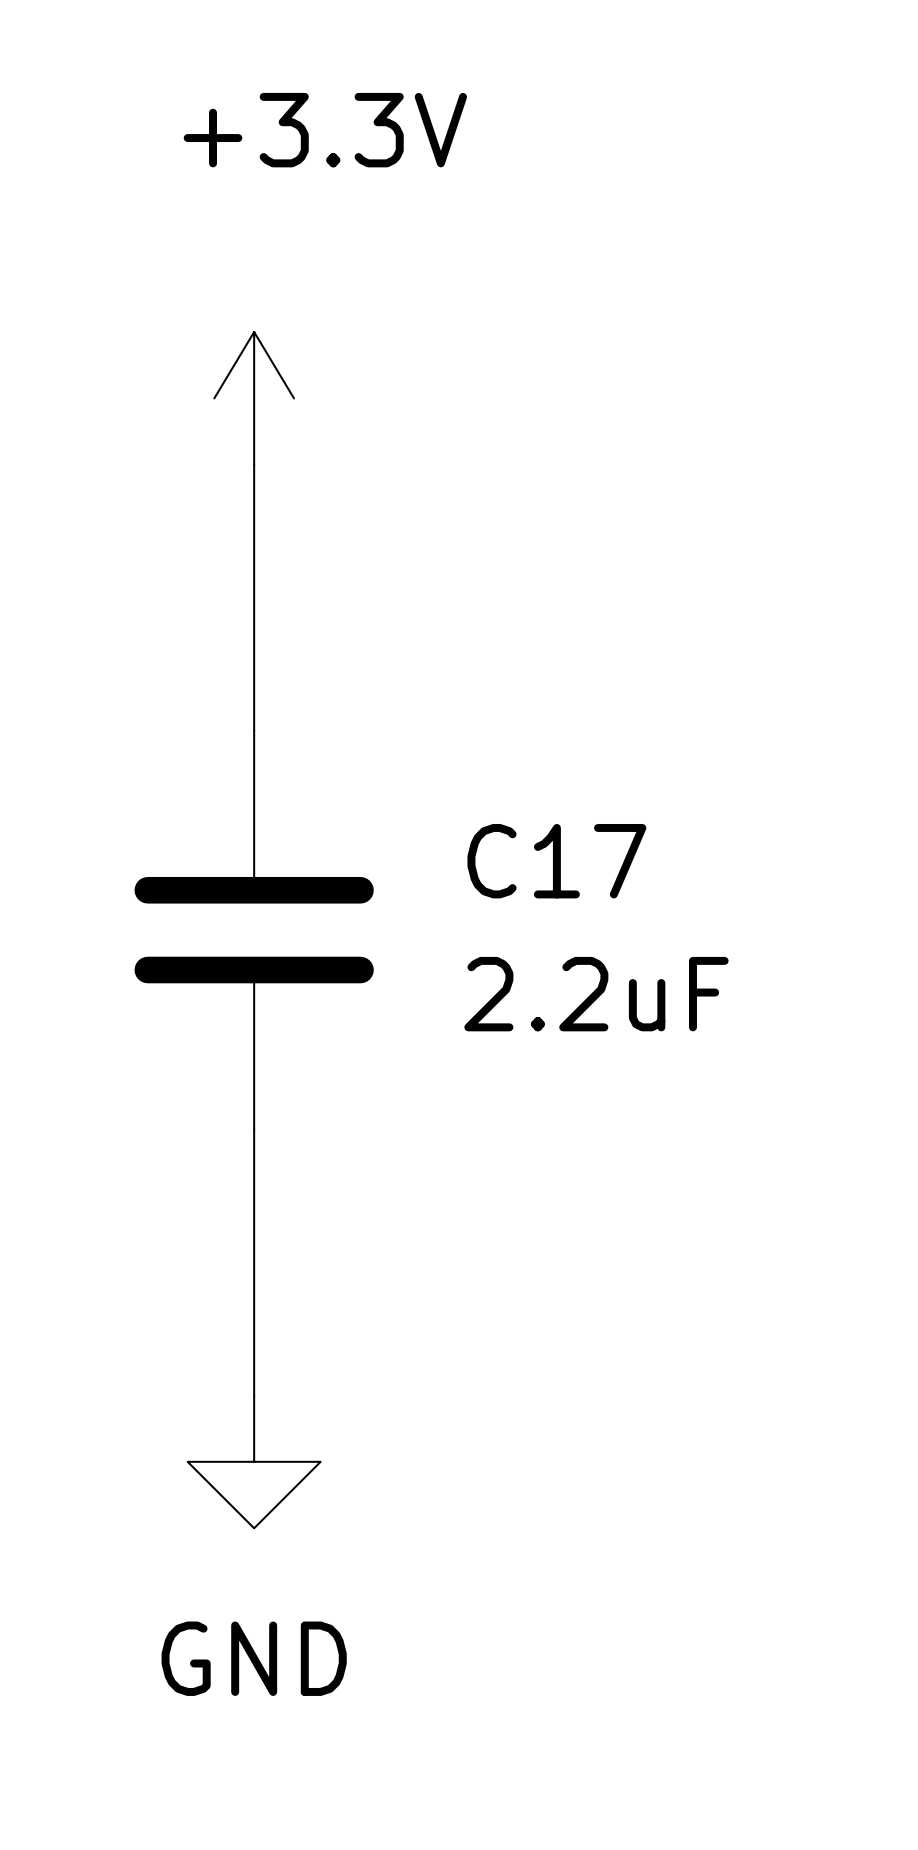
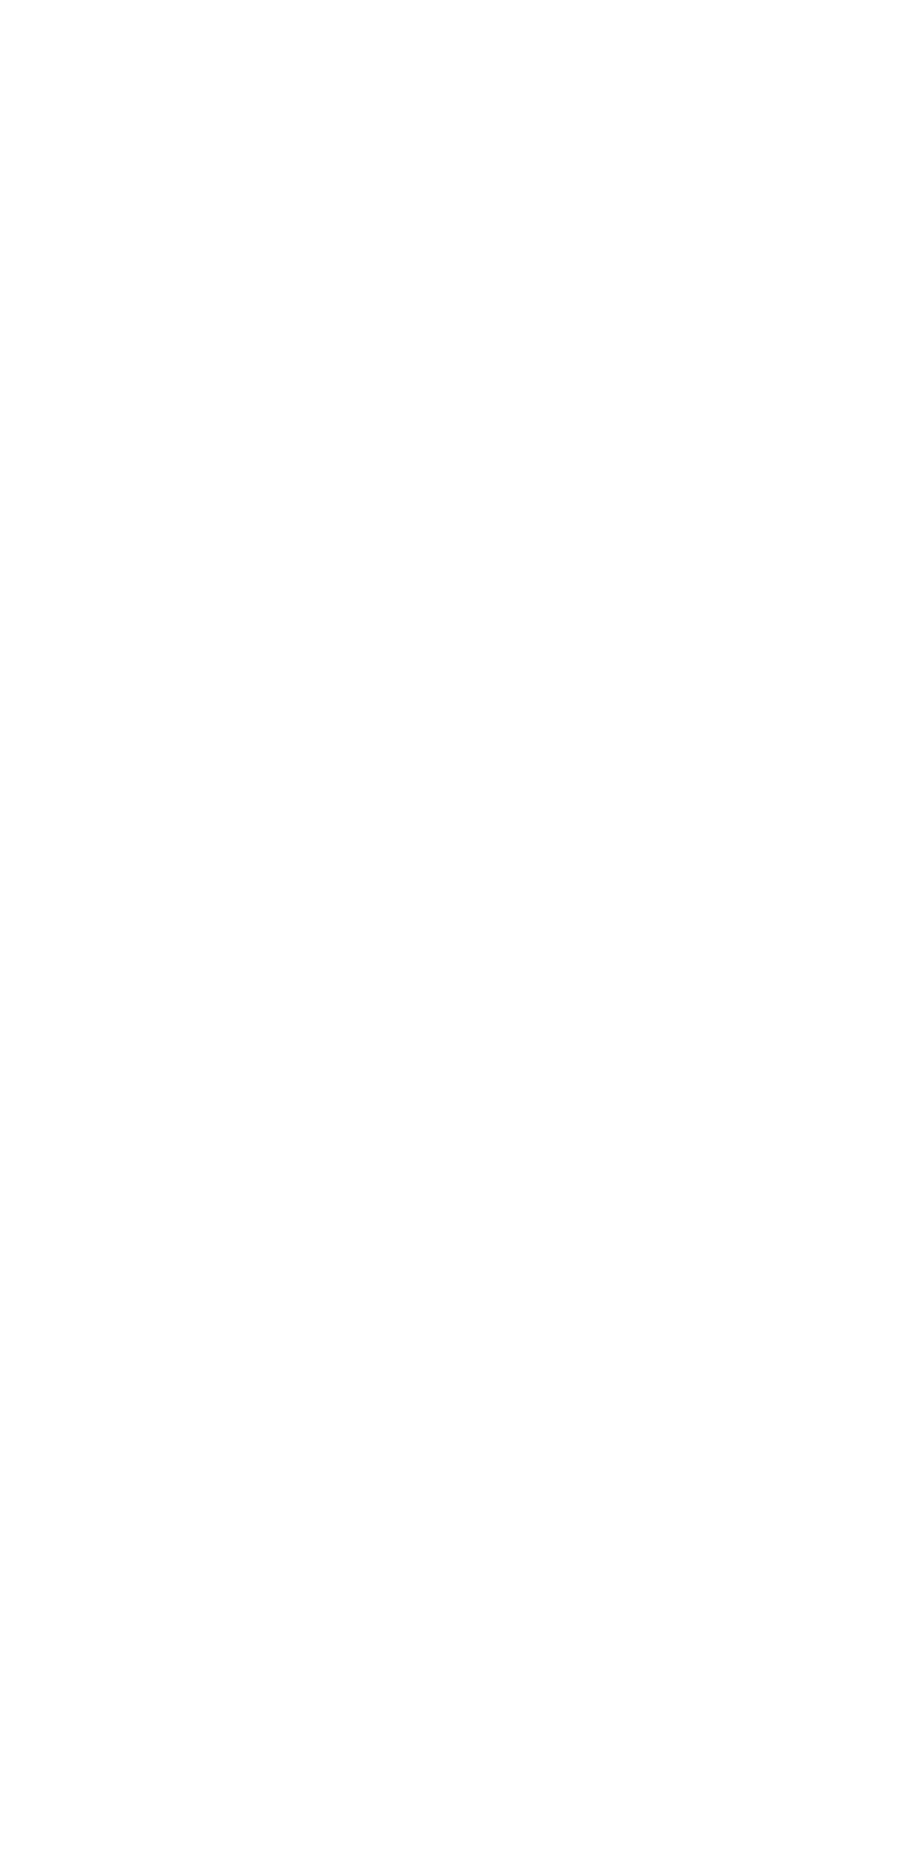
power symbol: +3.3V (254, 398) -> none
wire: (254, 464) (254, 730) -> none
C17: 2.2uF (254, 930) -> none
wire: (254, 1129) (254, 1395) -> none
power symbol: GND (254, 1461) -> none

